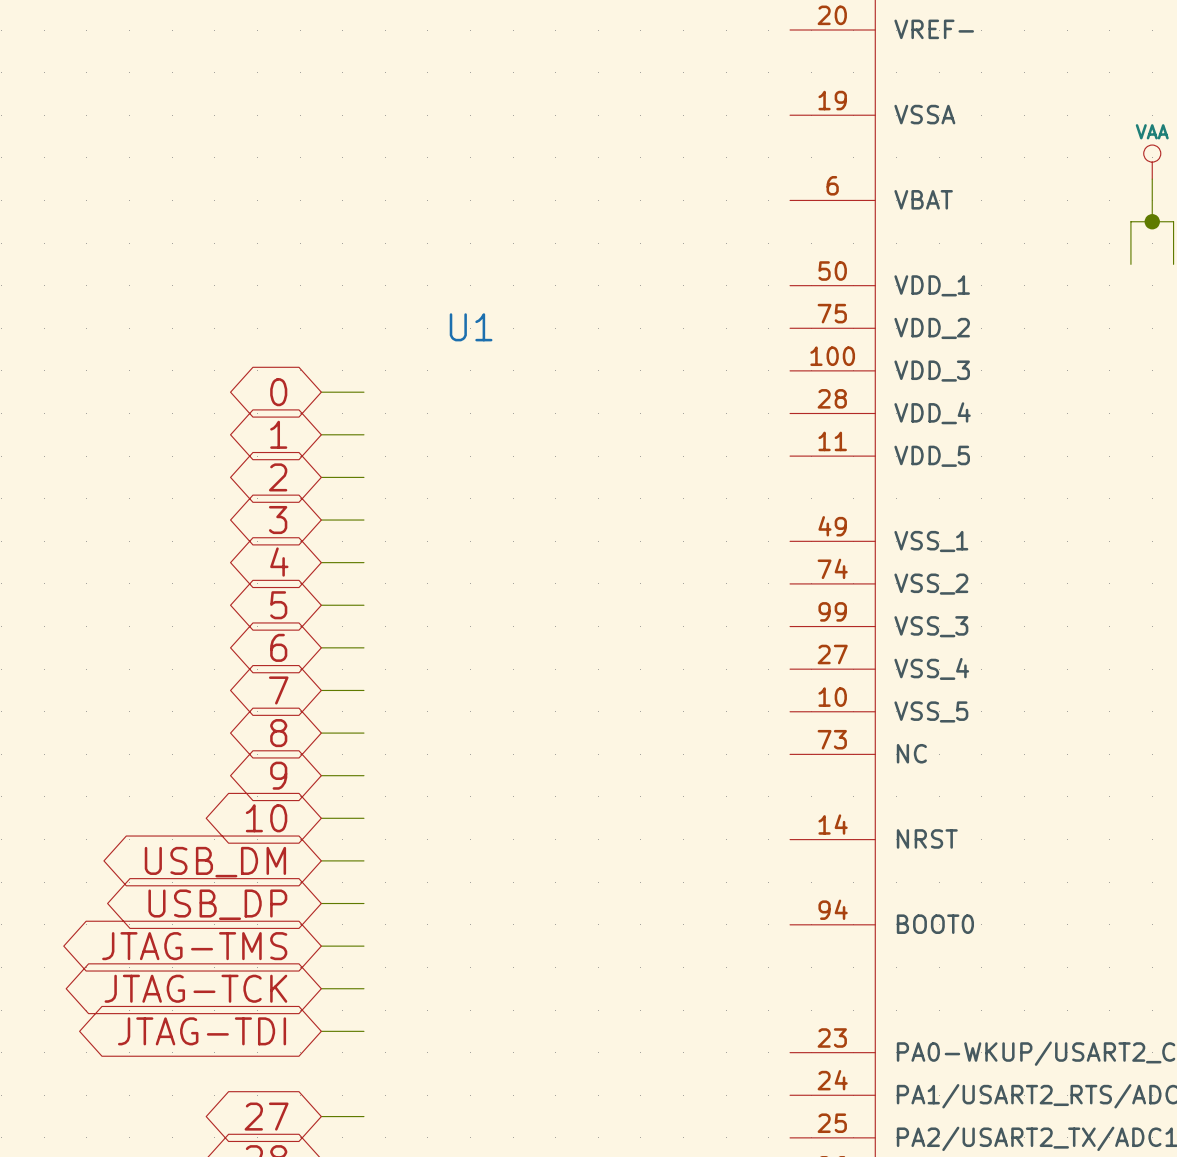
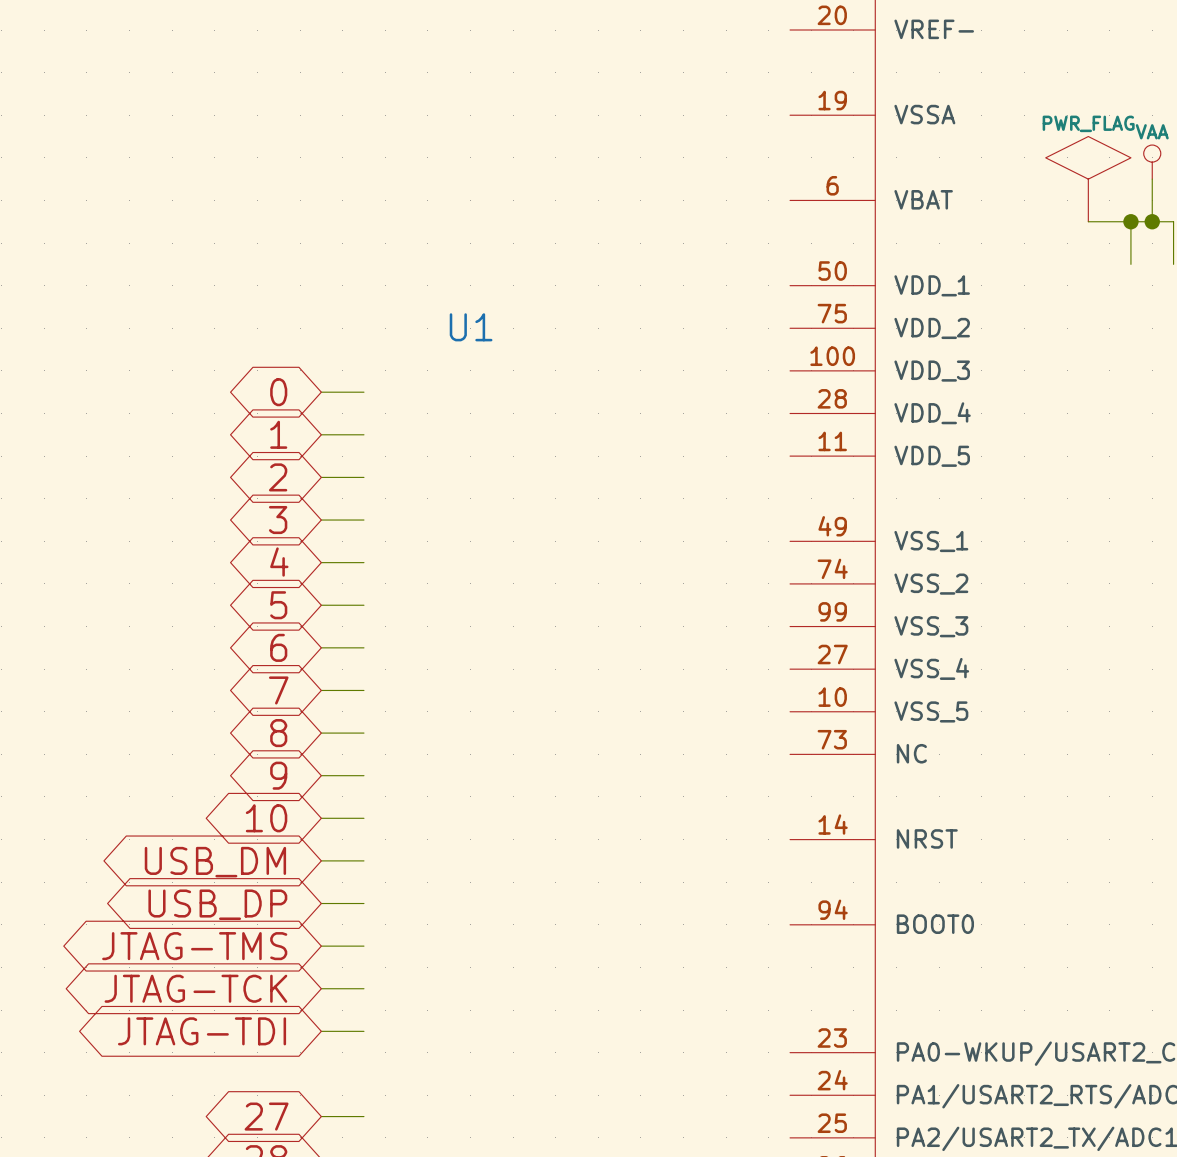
power symbol: none -> PWR_FLAG (1088, 179)
wire: none -> (1088, 221) (1130, 221)
junction: none -> (1130, 221)

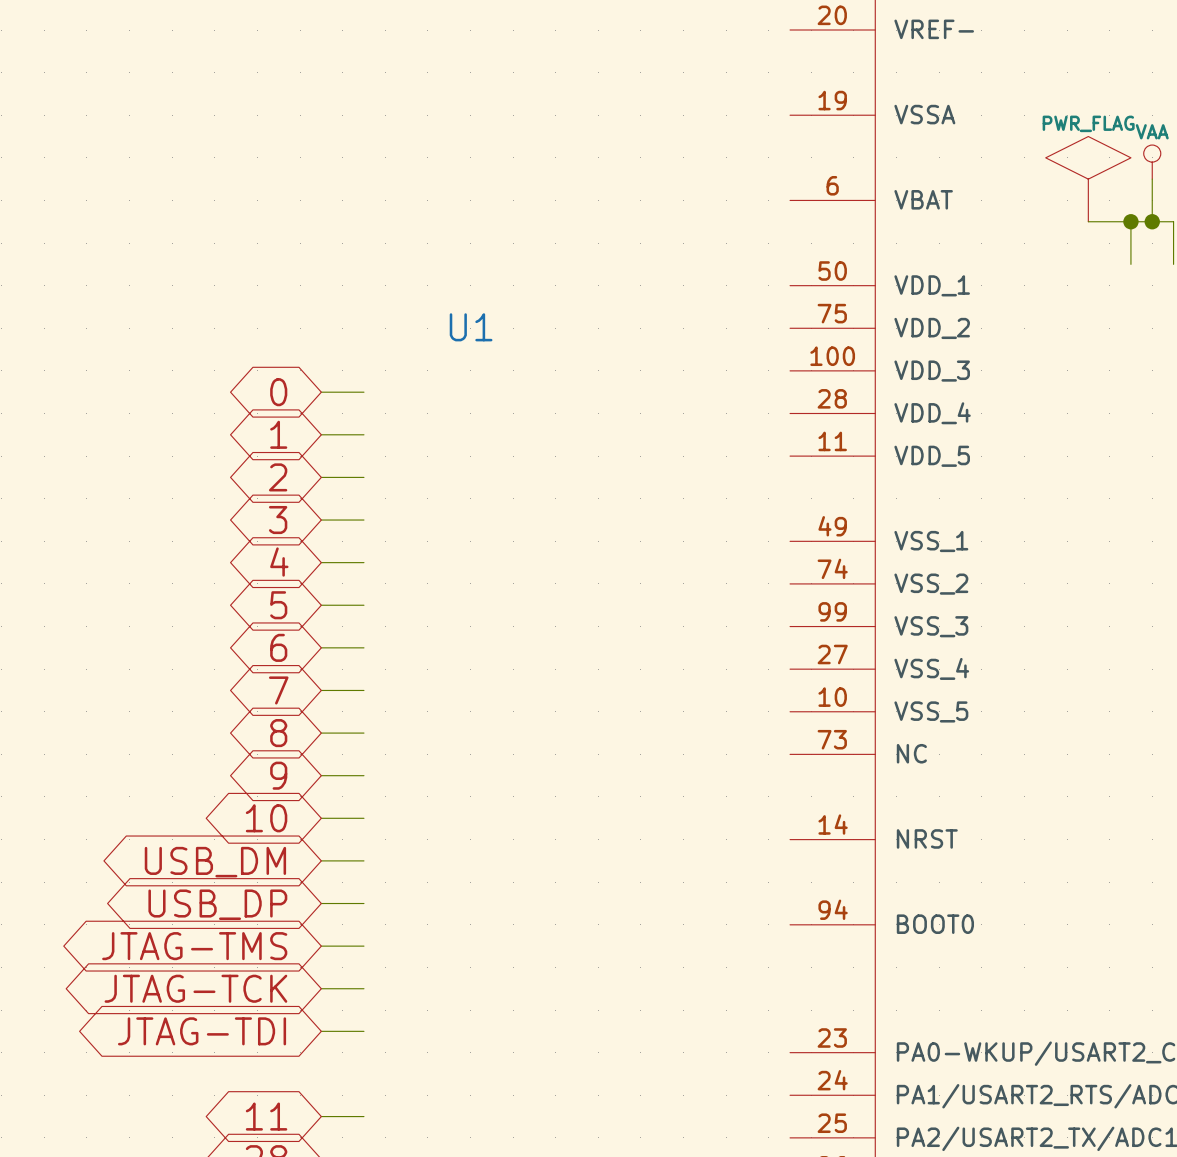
global label: 27 (266, 1116) -> 11 (266, 1116)

